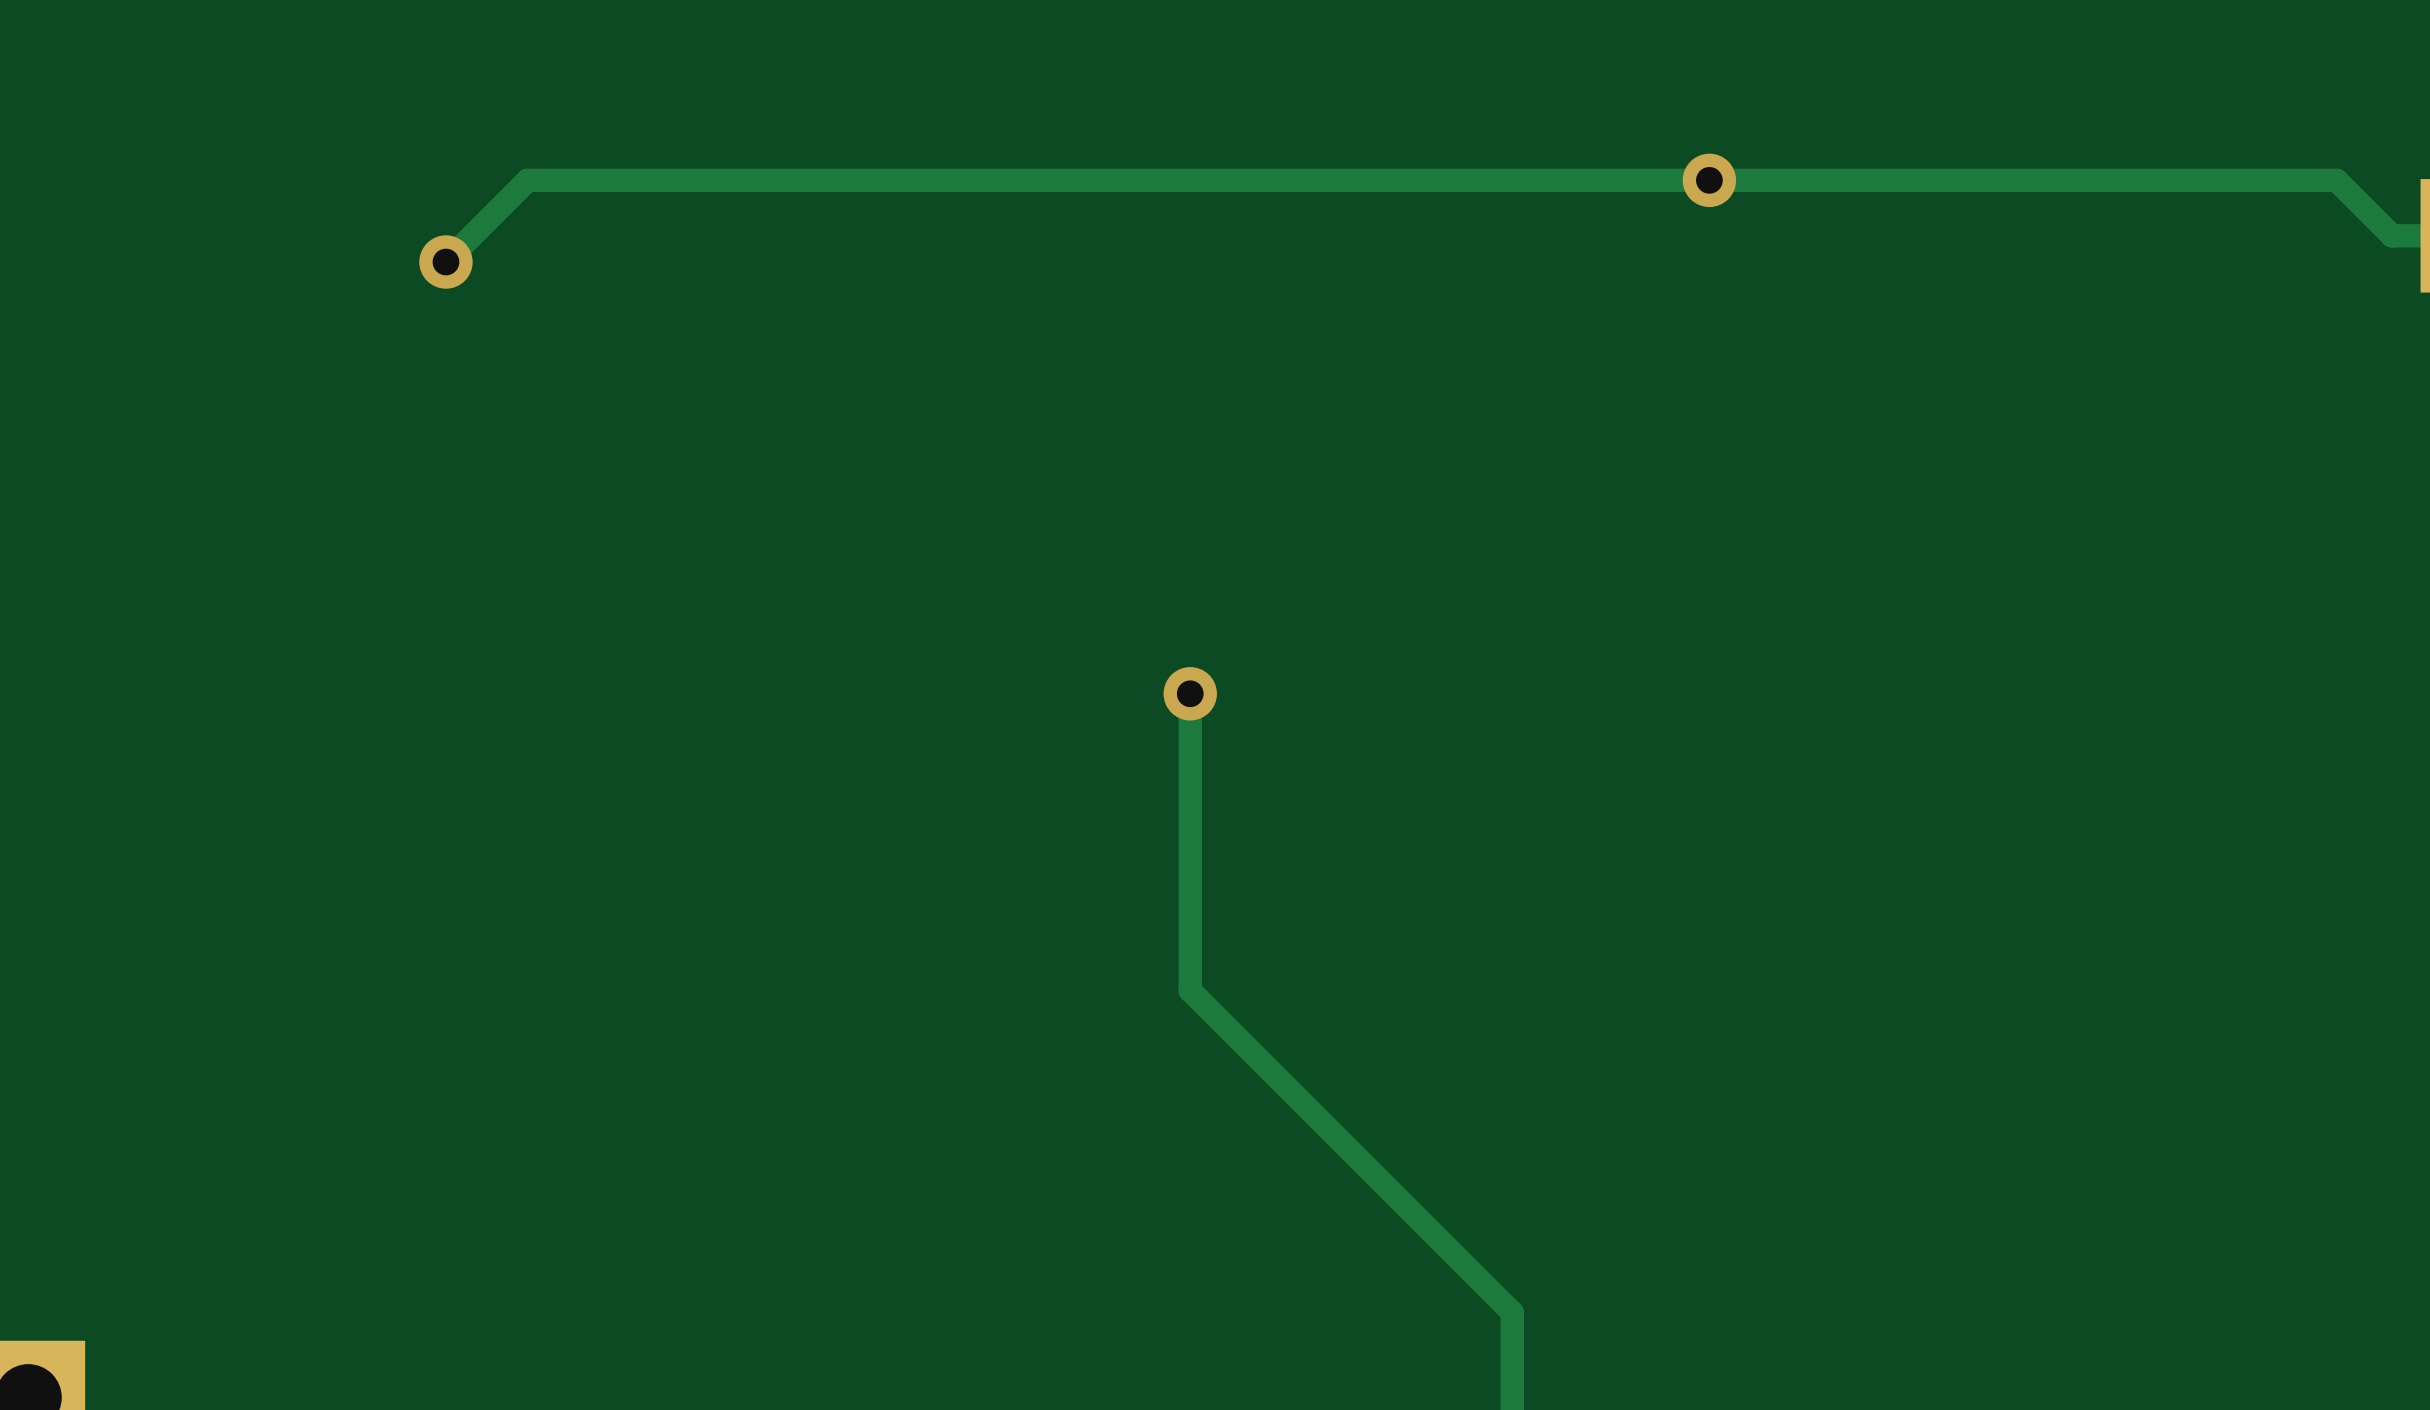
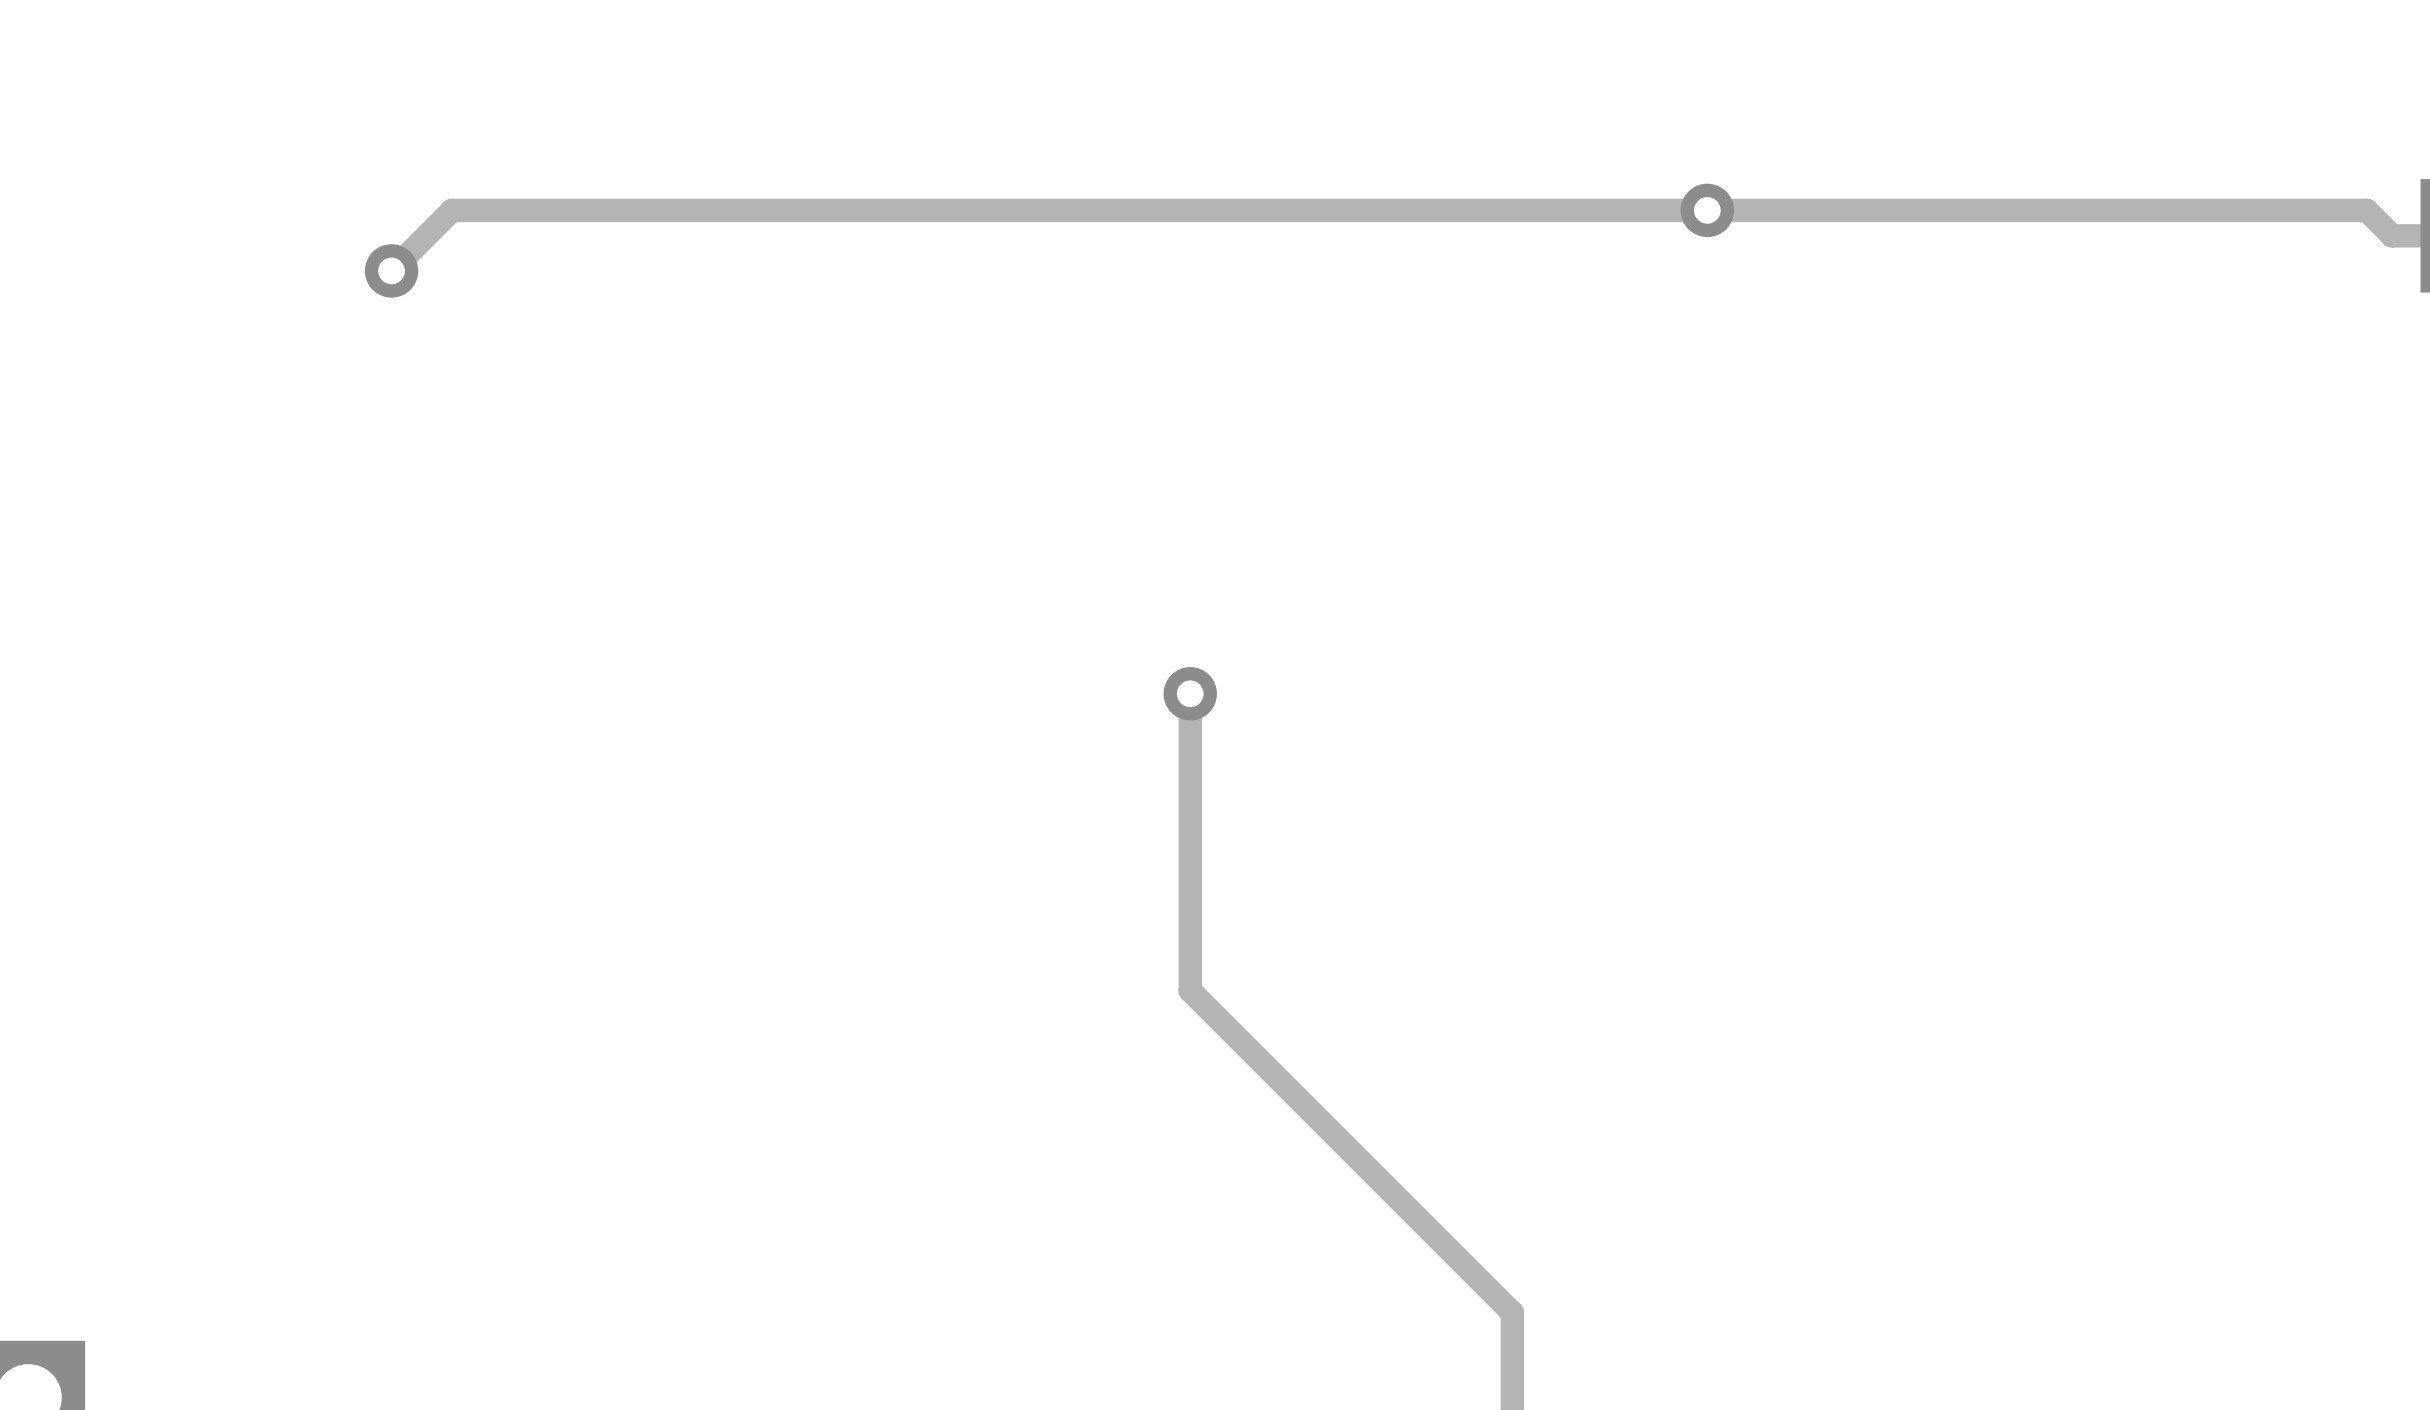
via position: (1709, 180) -> (1707, 210)
track: (2366, 210) (2336, 180) (527, 180) (445, 262) -> (2366, 210) (452, 210) (391, 270)
via position: (445, 262) -> (391, 270)

